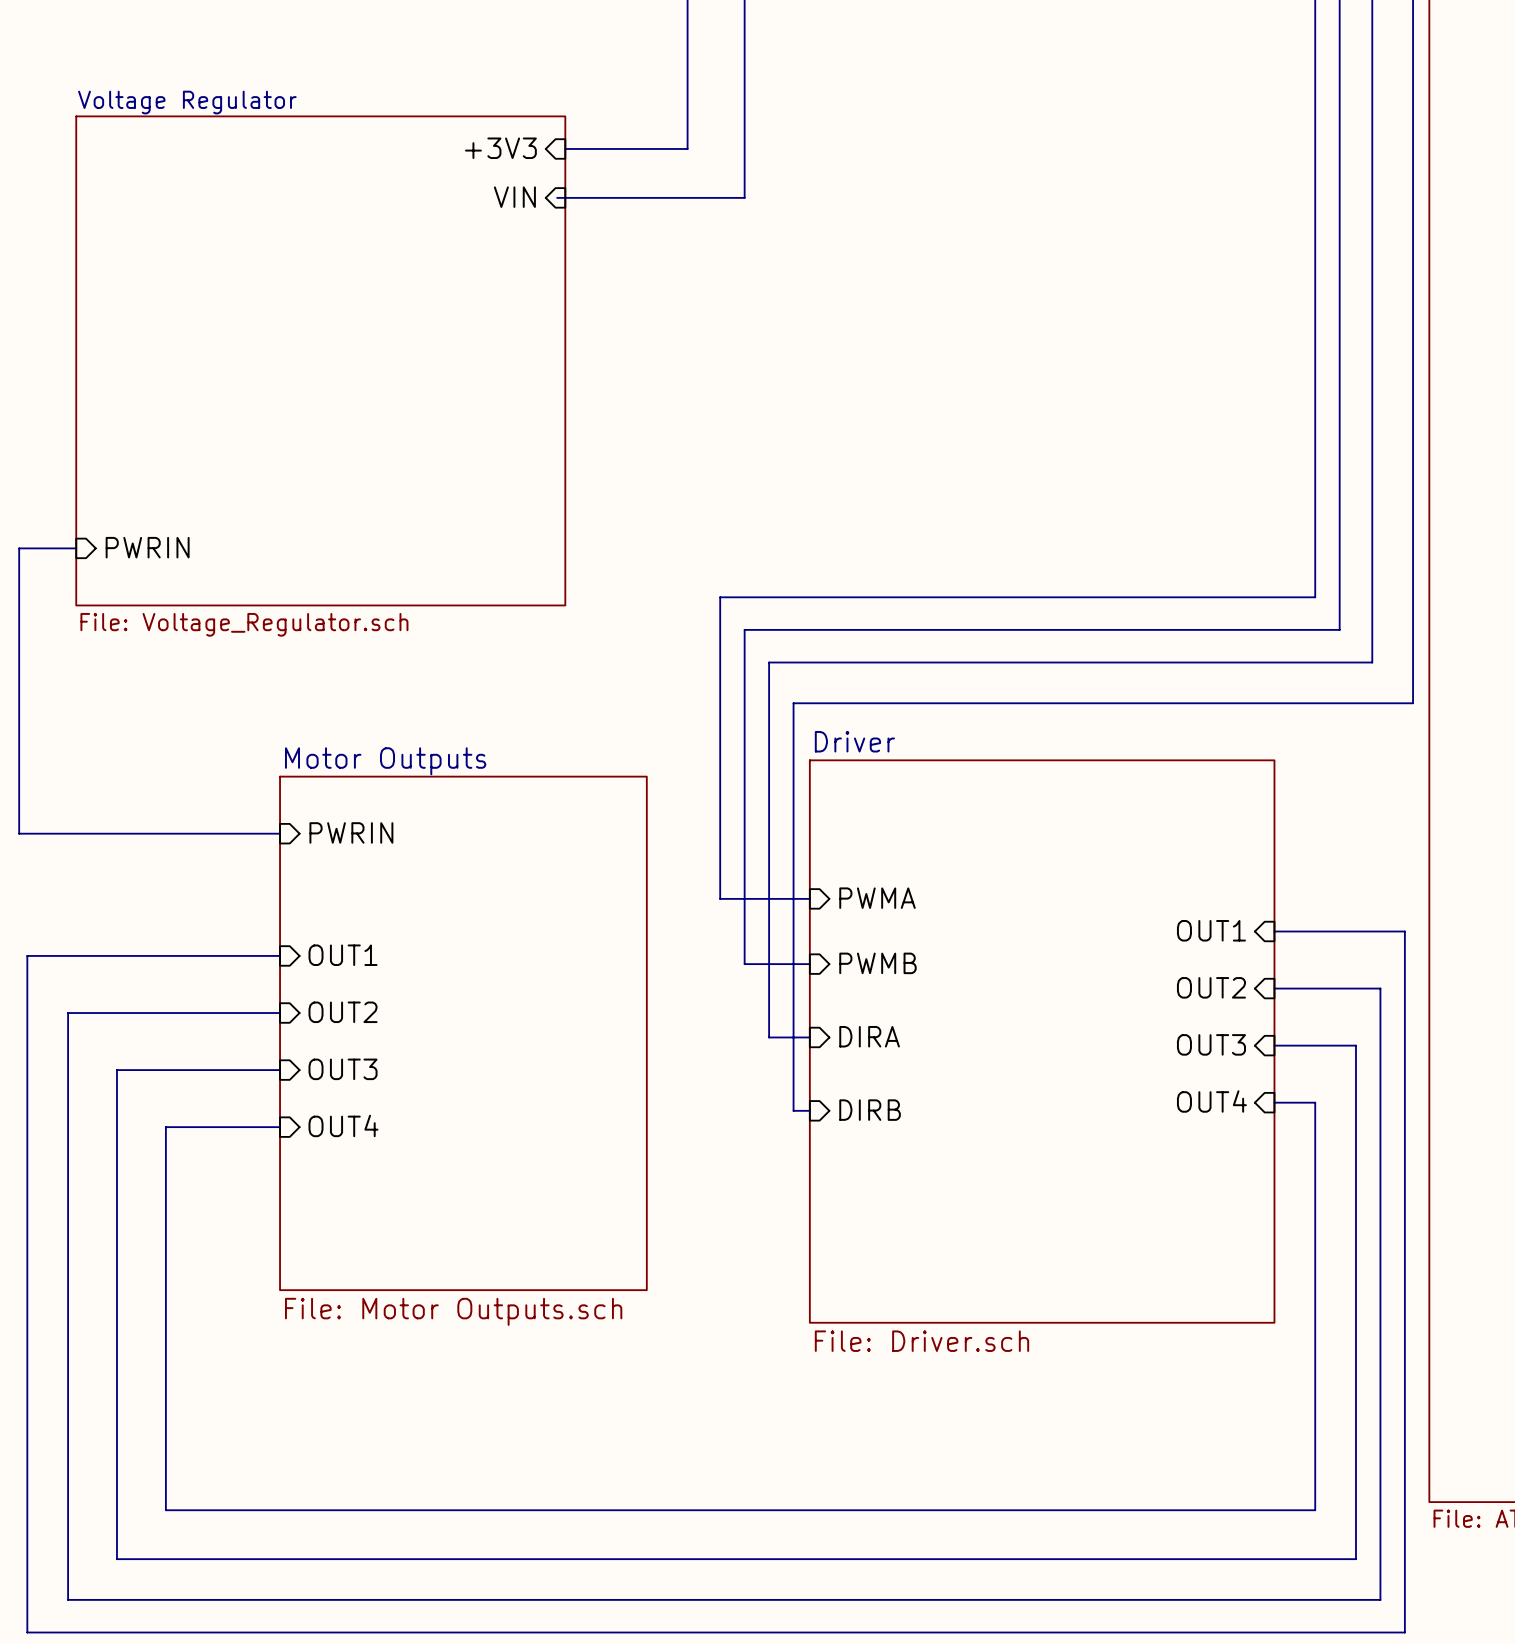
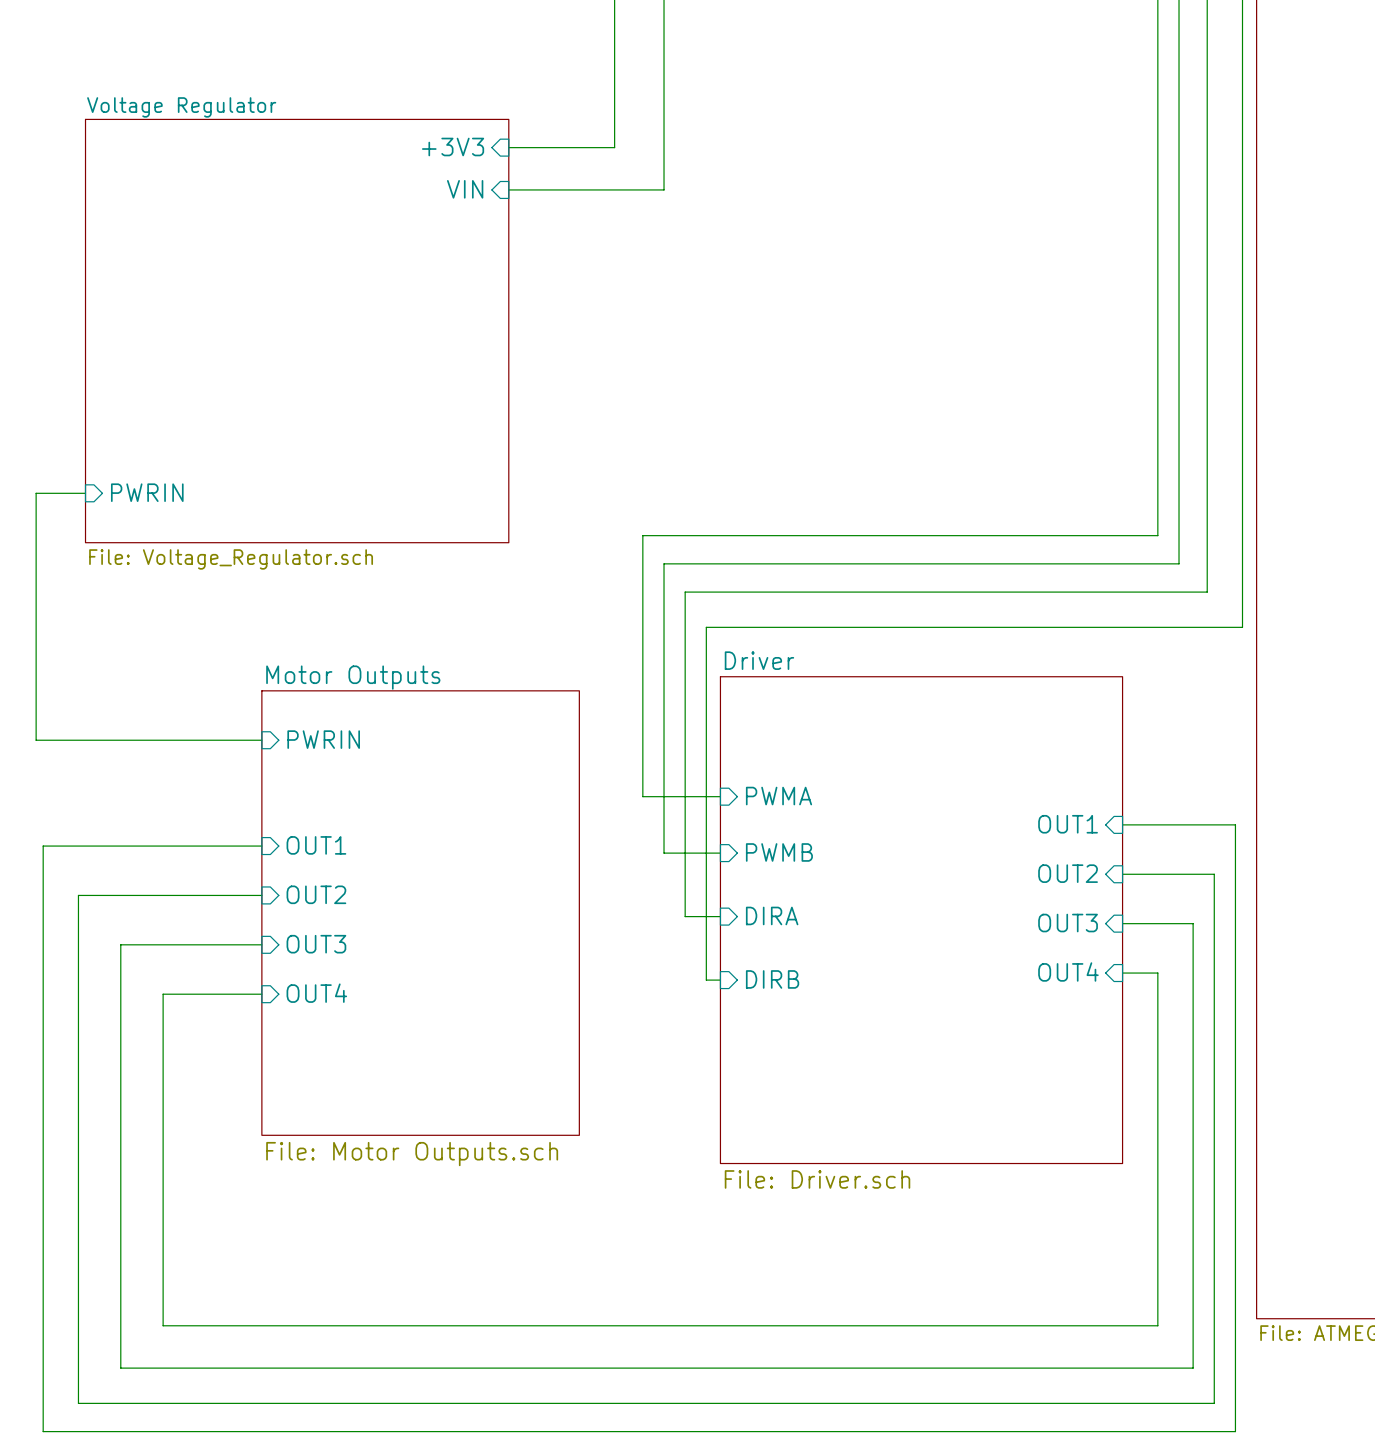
wire: (557, 197) (565, 197) -> none

